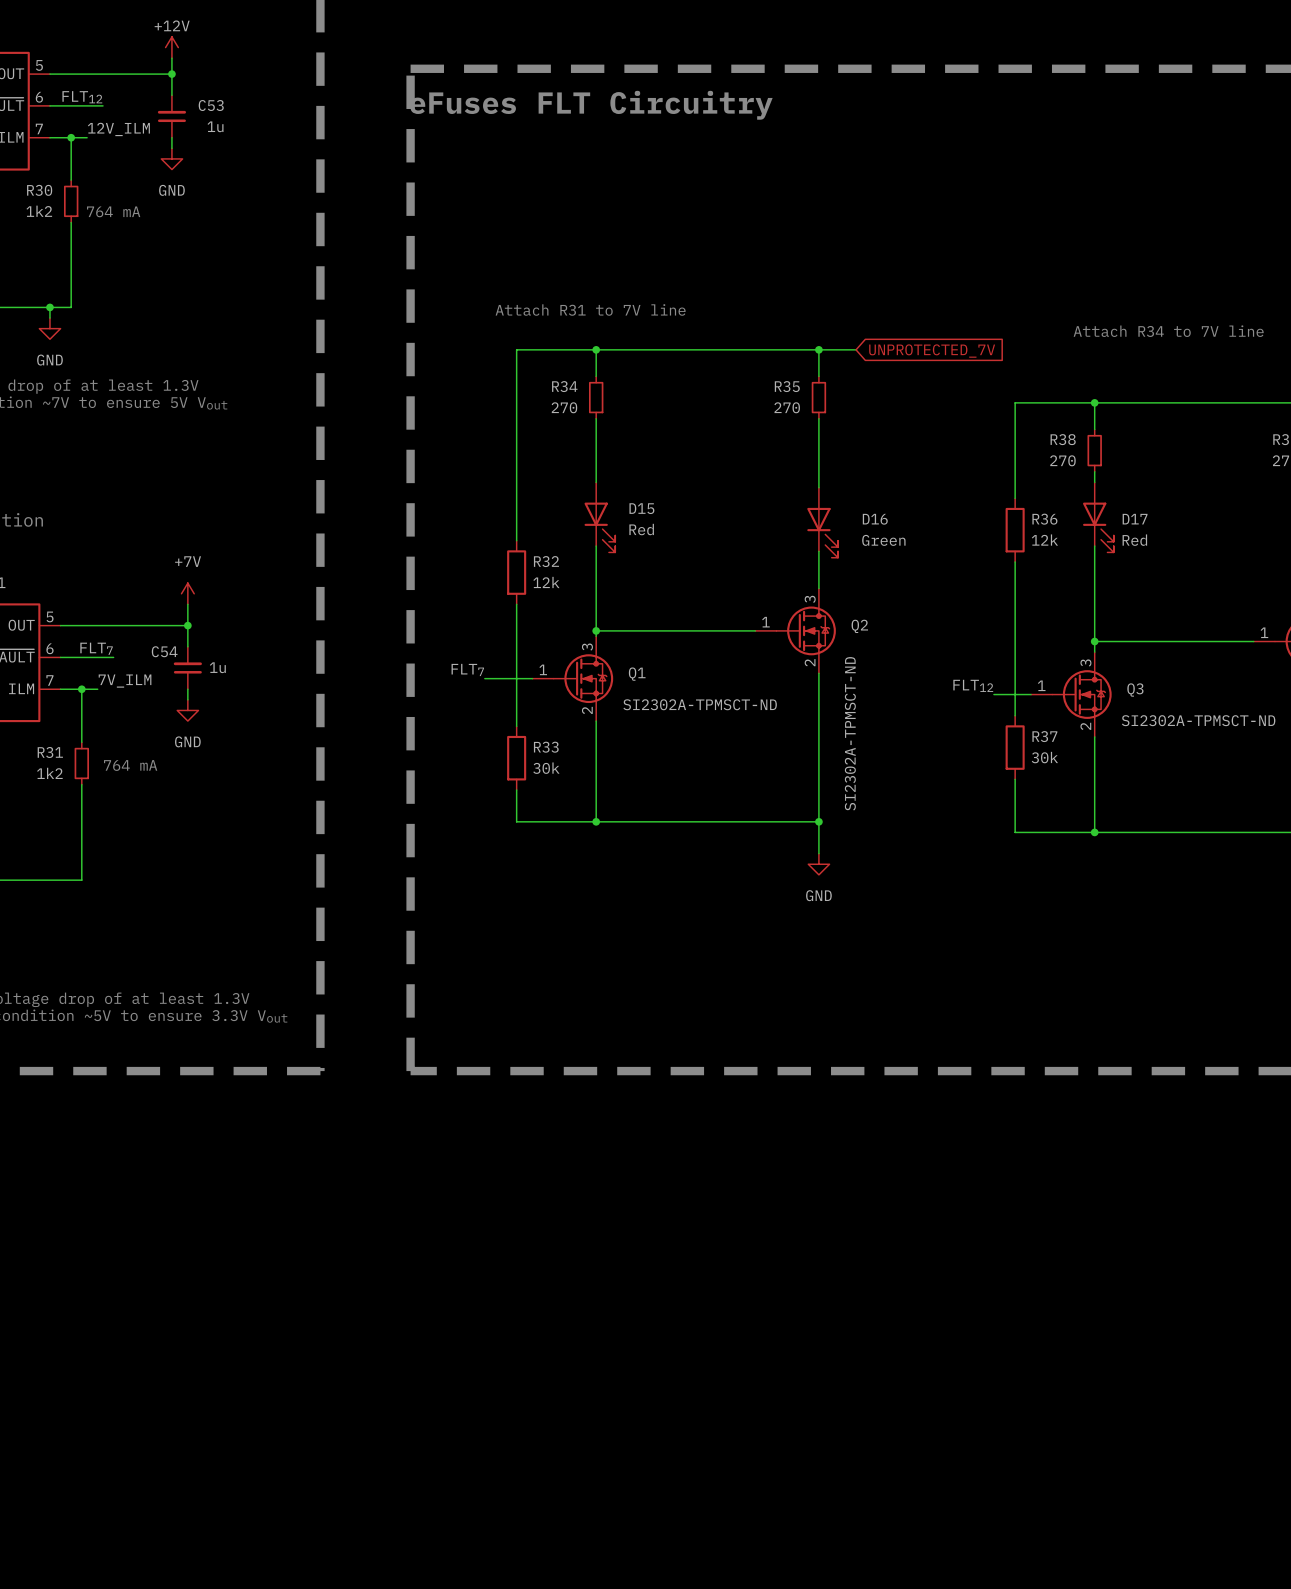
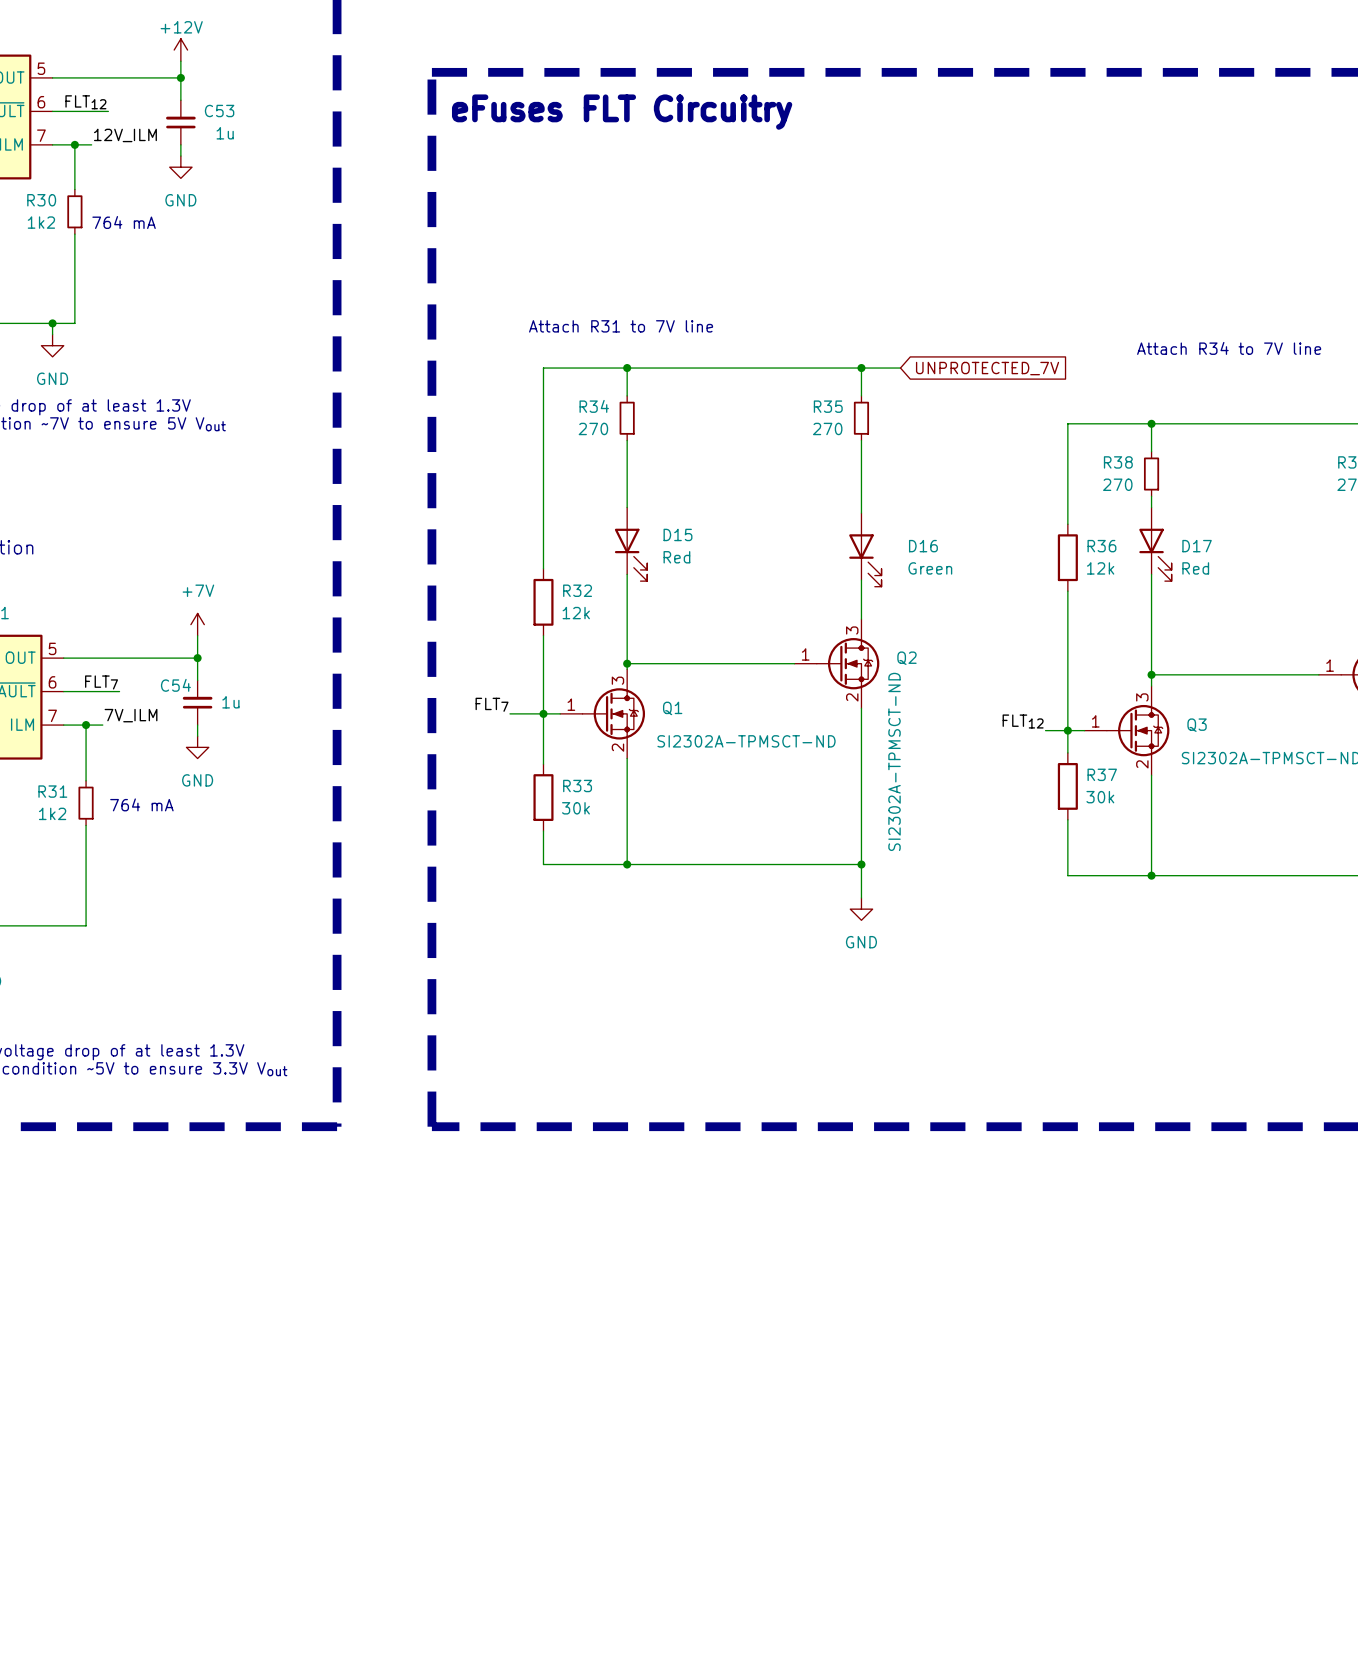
junction: none -> (543, 713)
junction: none -> (1067, 730)

